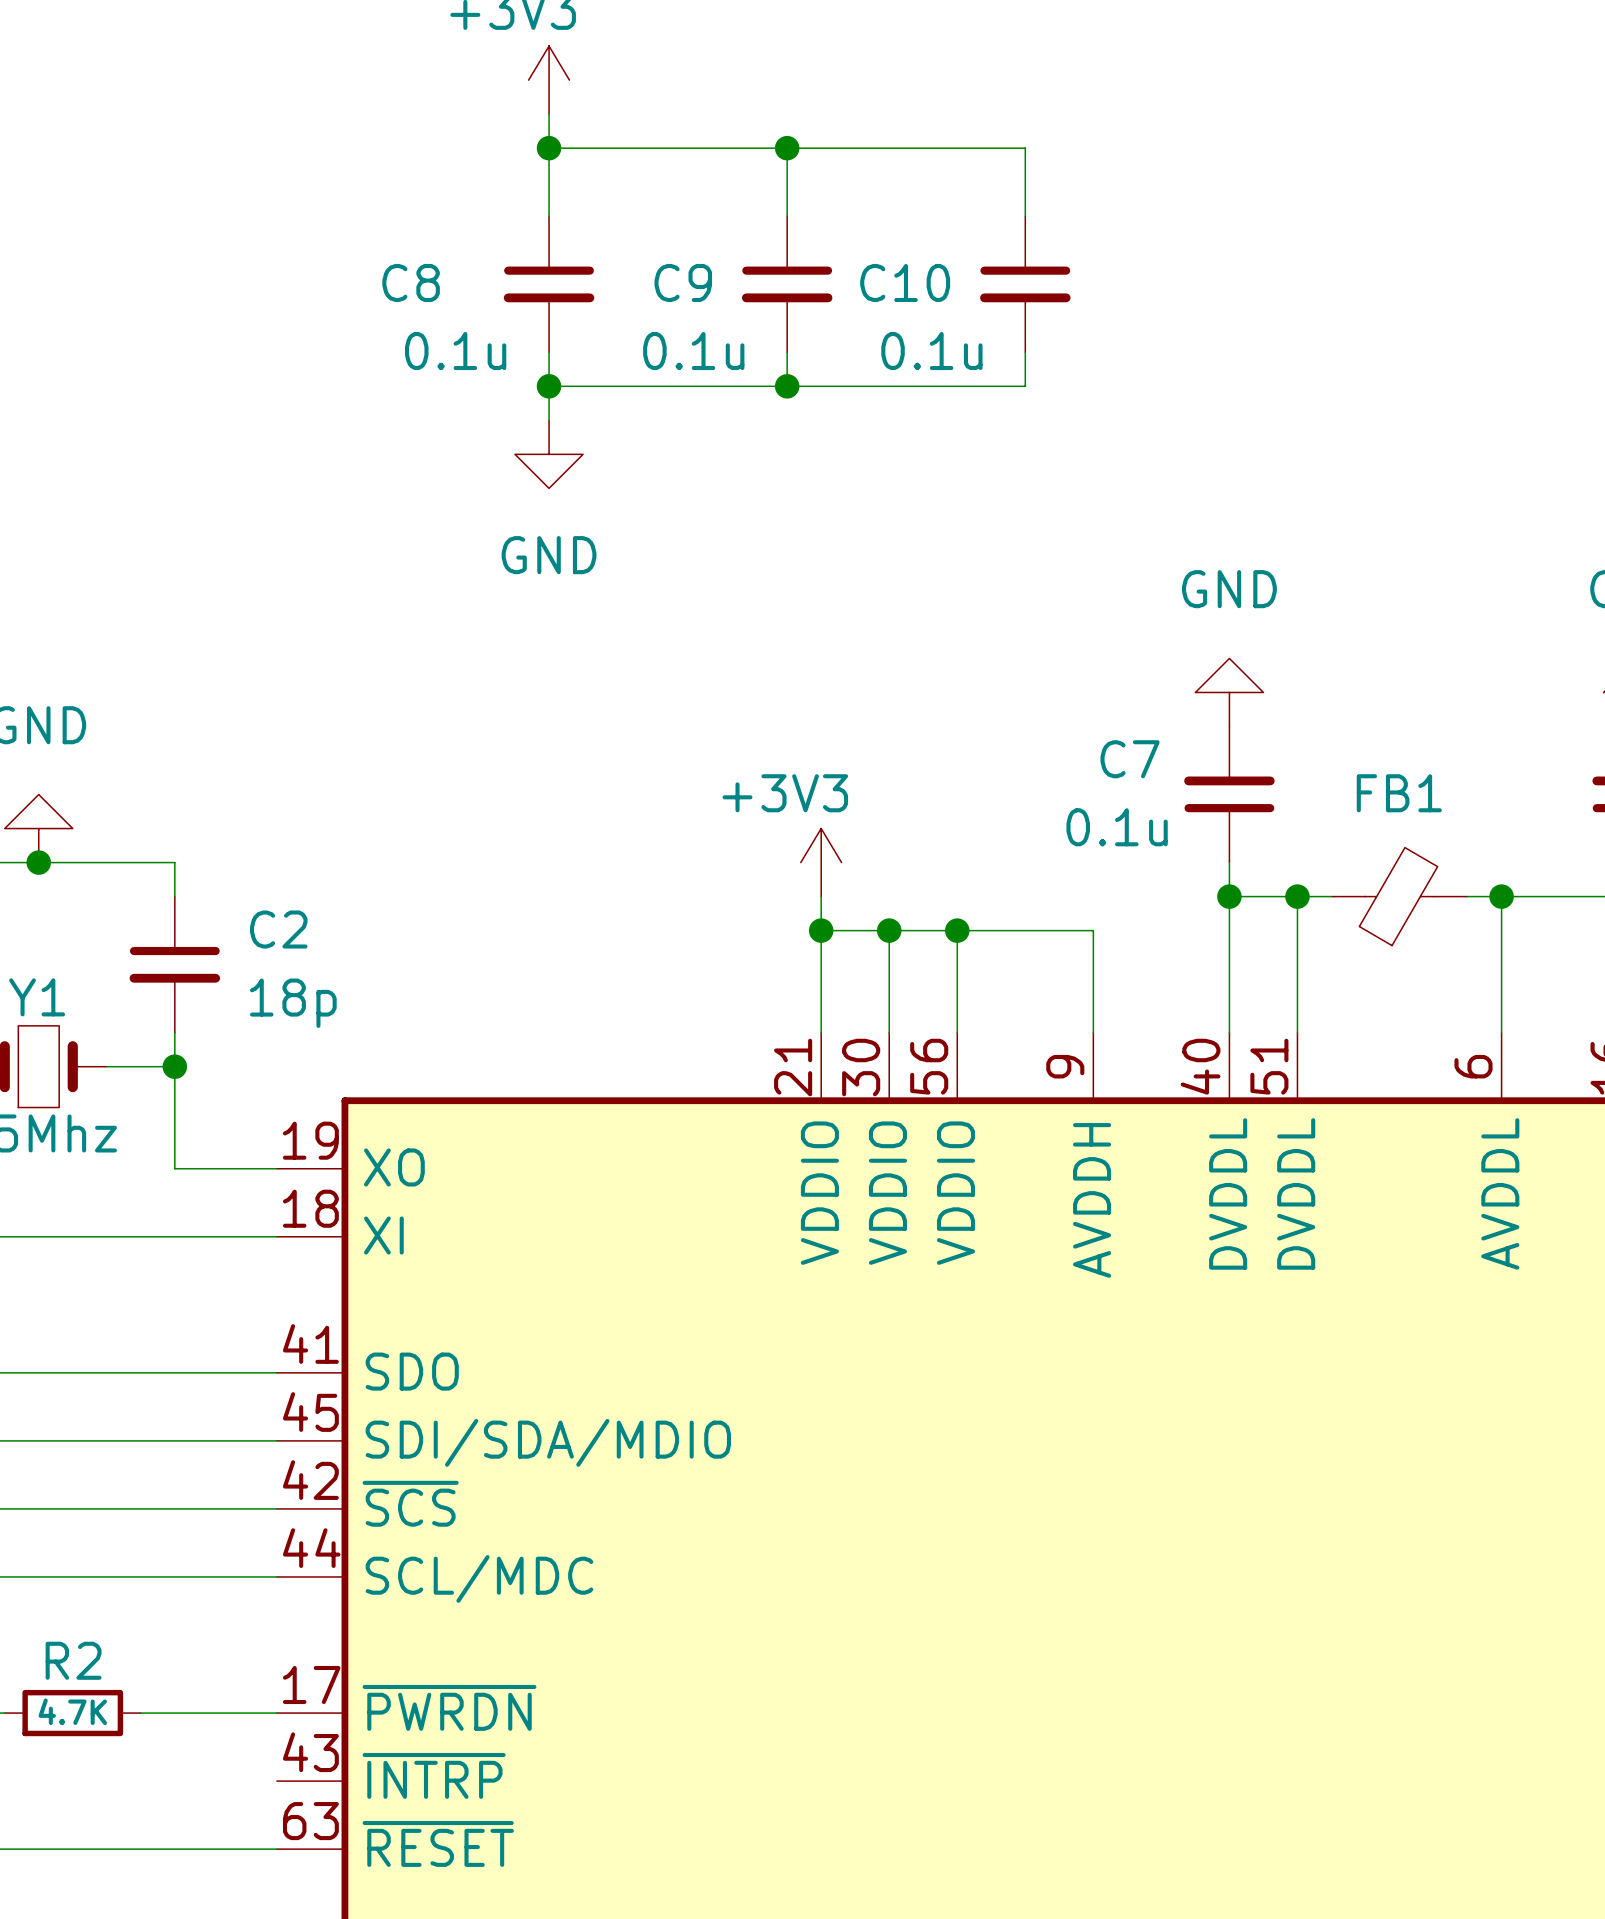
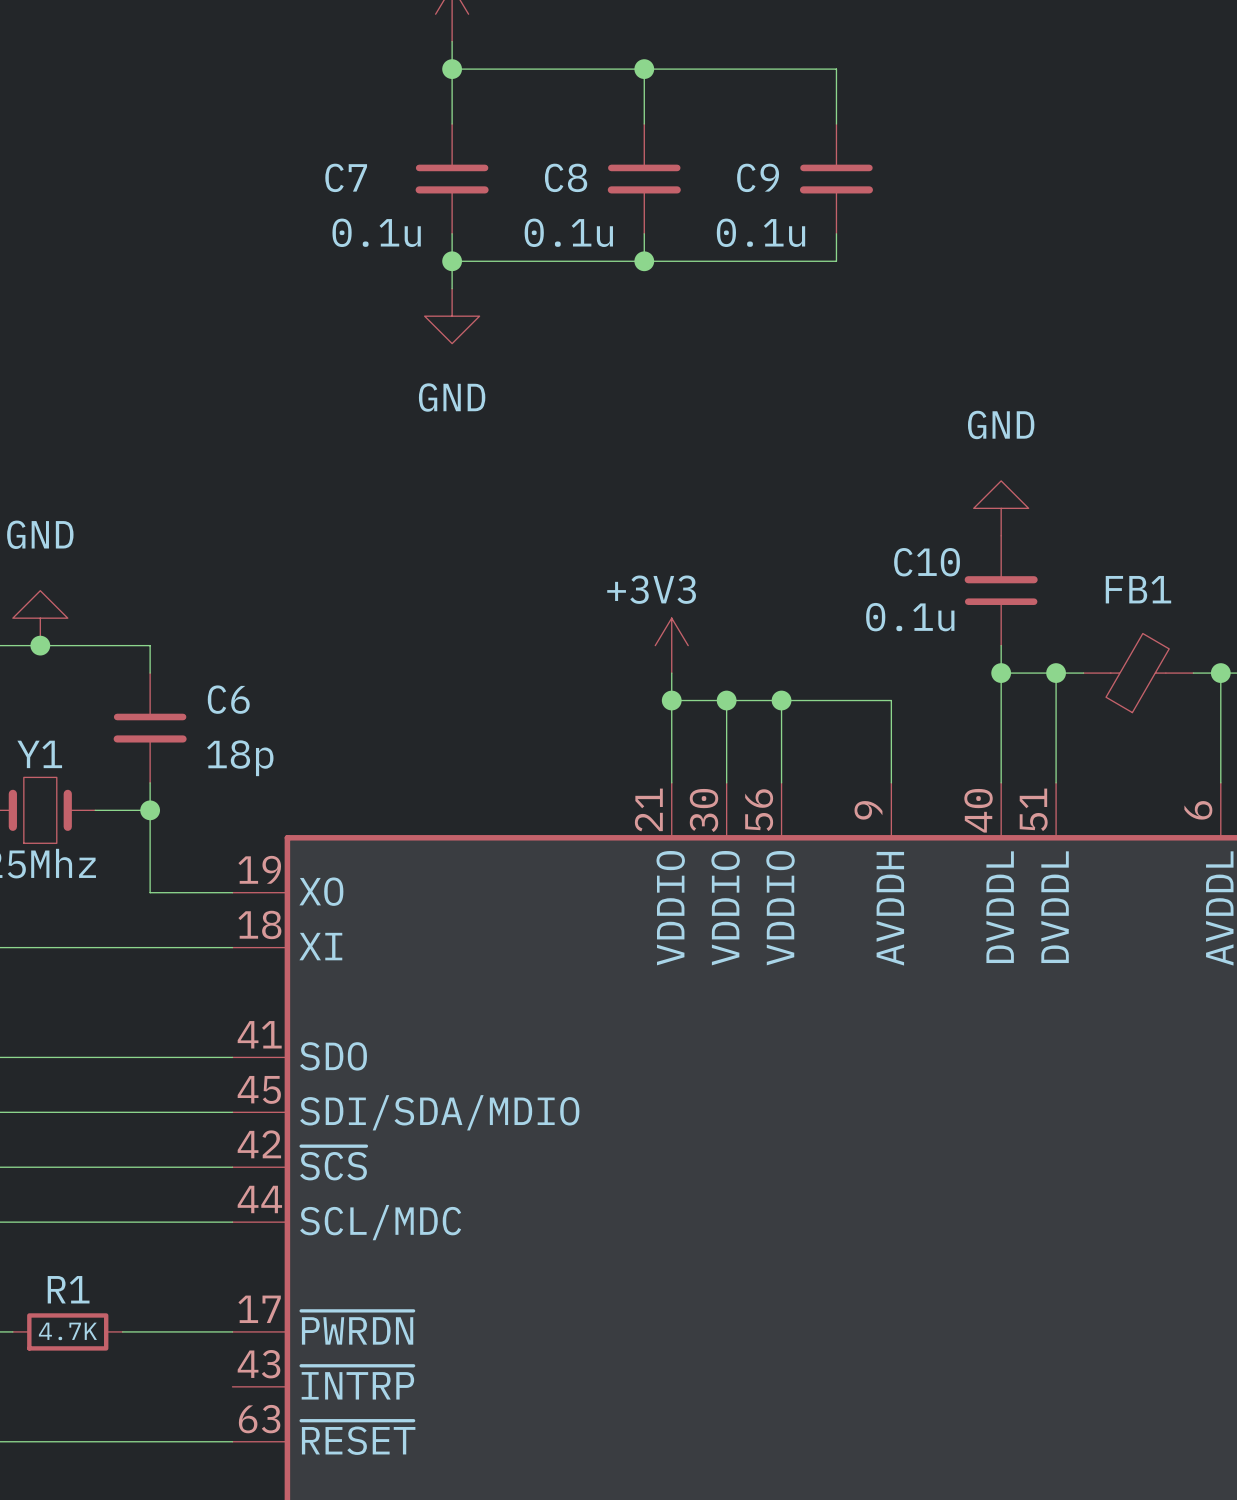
C8 name: C8 (411, 282) -> C7 (346, 177)
C9 name: C9 (683, 282) -> C8 (566, 177)
C10 name: C10 (905, 282) -> C9 (758, 177)
C7 name: C7 (1130, 759) -> C10 (927, 562)
C2 name: C2 (278, 929) -> C6 (228, 699)
R2 name: R2 (73, 1660) -> R1 (68, 1289)

